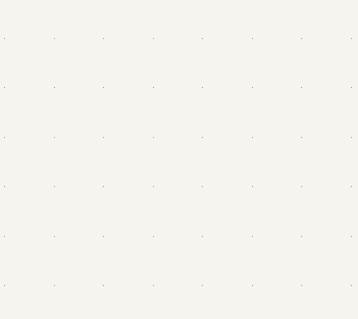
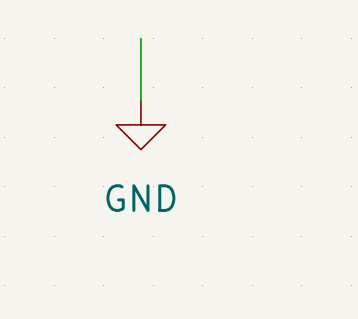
wire: none -> (140, 38) (140, 100)
power symbol: none -> GND (140, 124)

